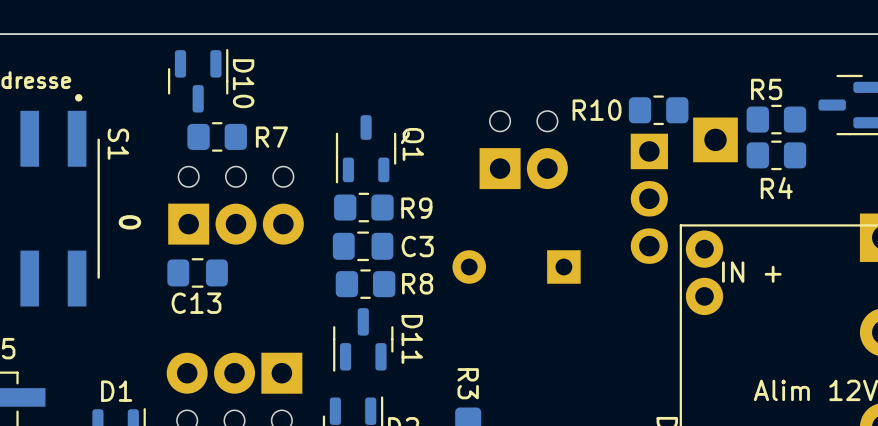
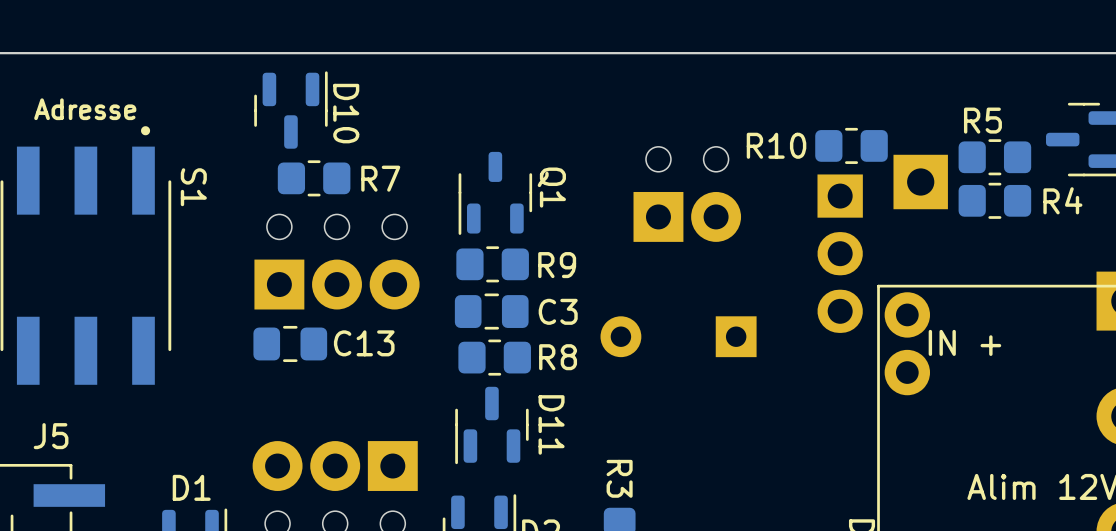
R4 name position: R4 (776, 188) -> R4 (1062, 200)
text: 0 (129, 222) -> none
C13 name position: C13 (196, 303) -> C13 (364, 343)

